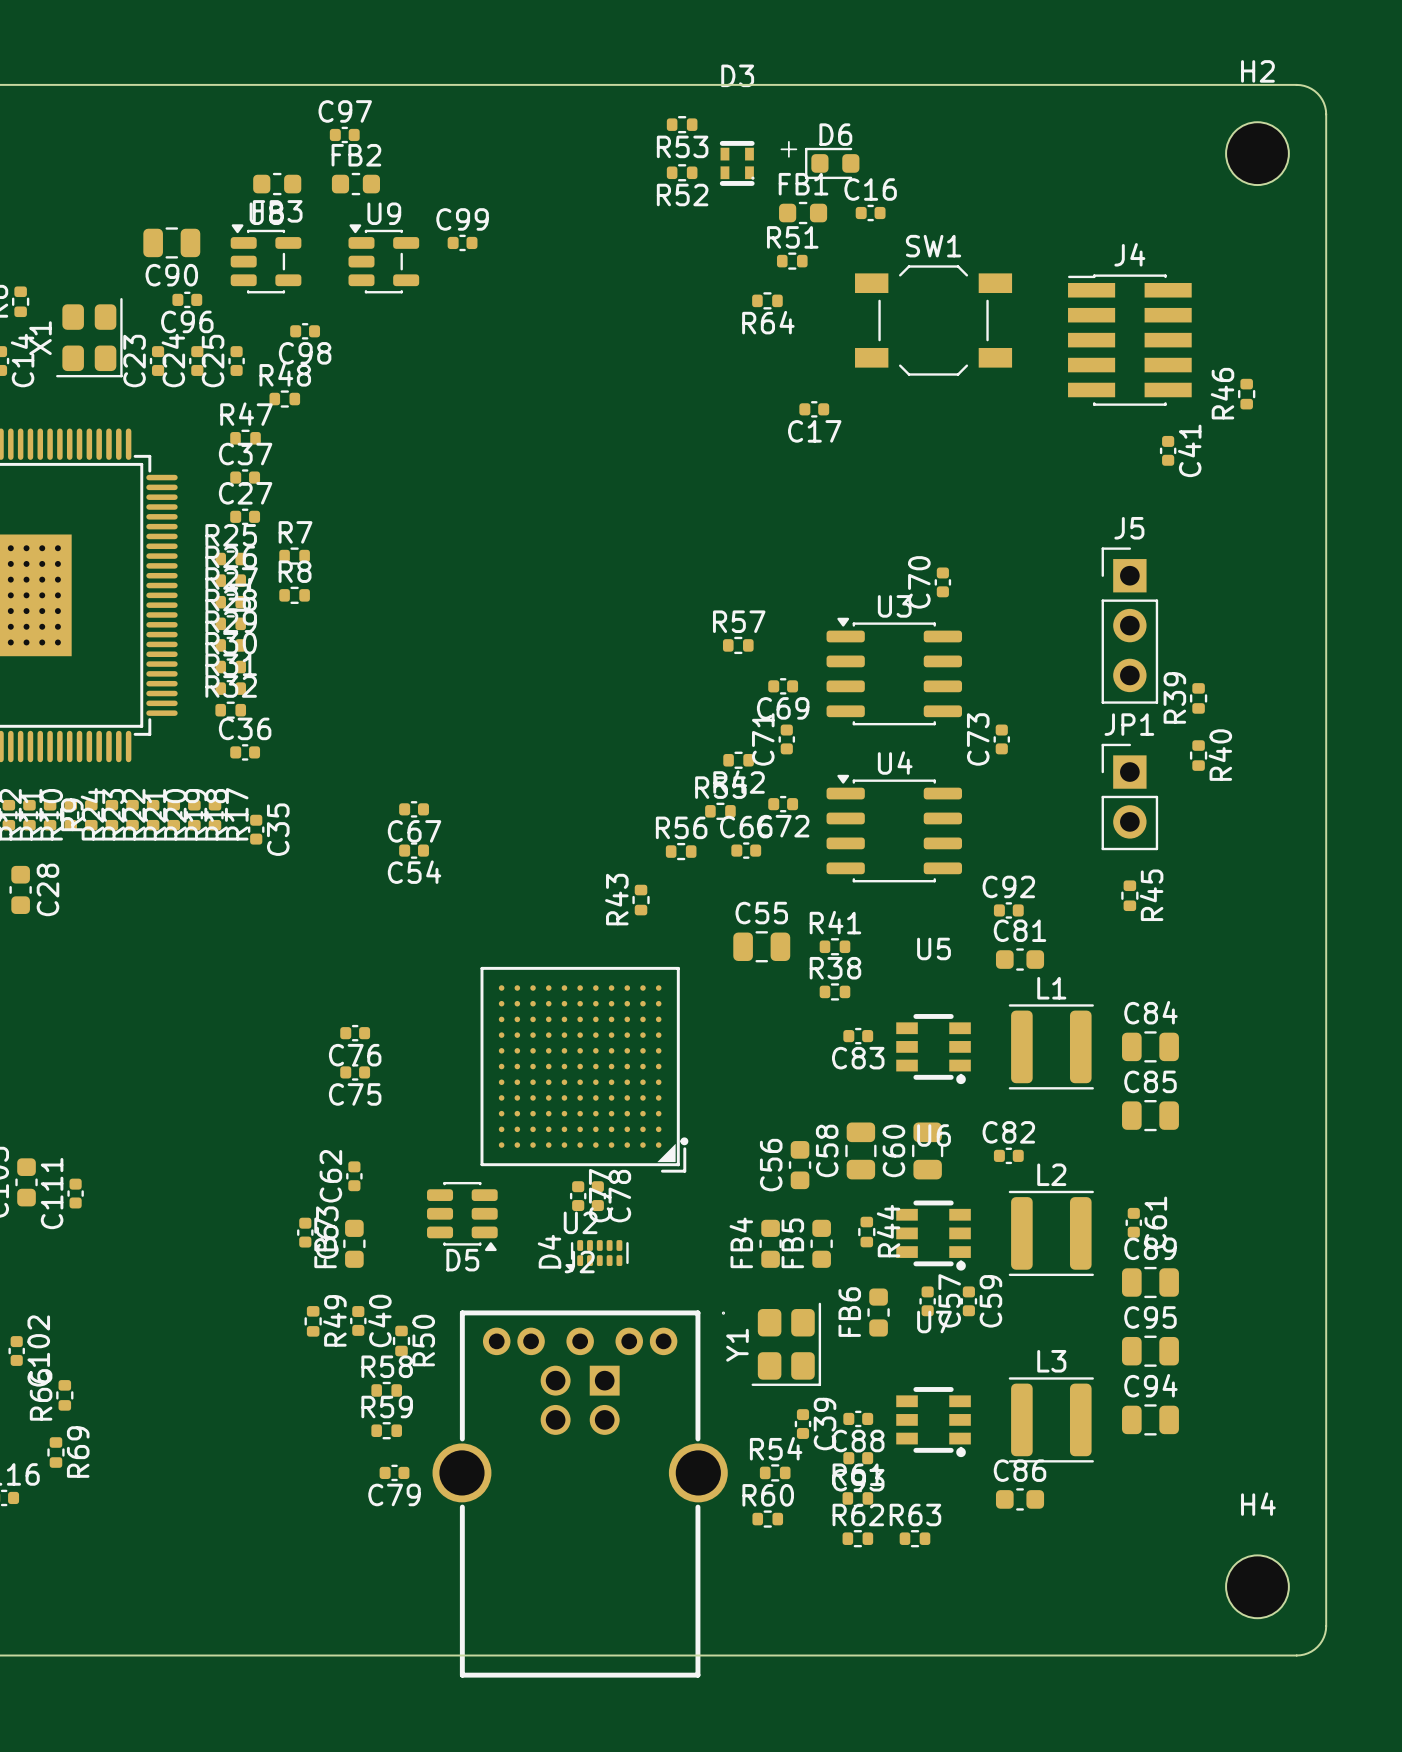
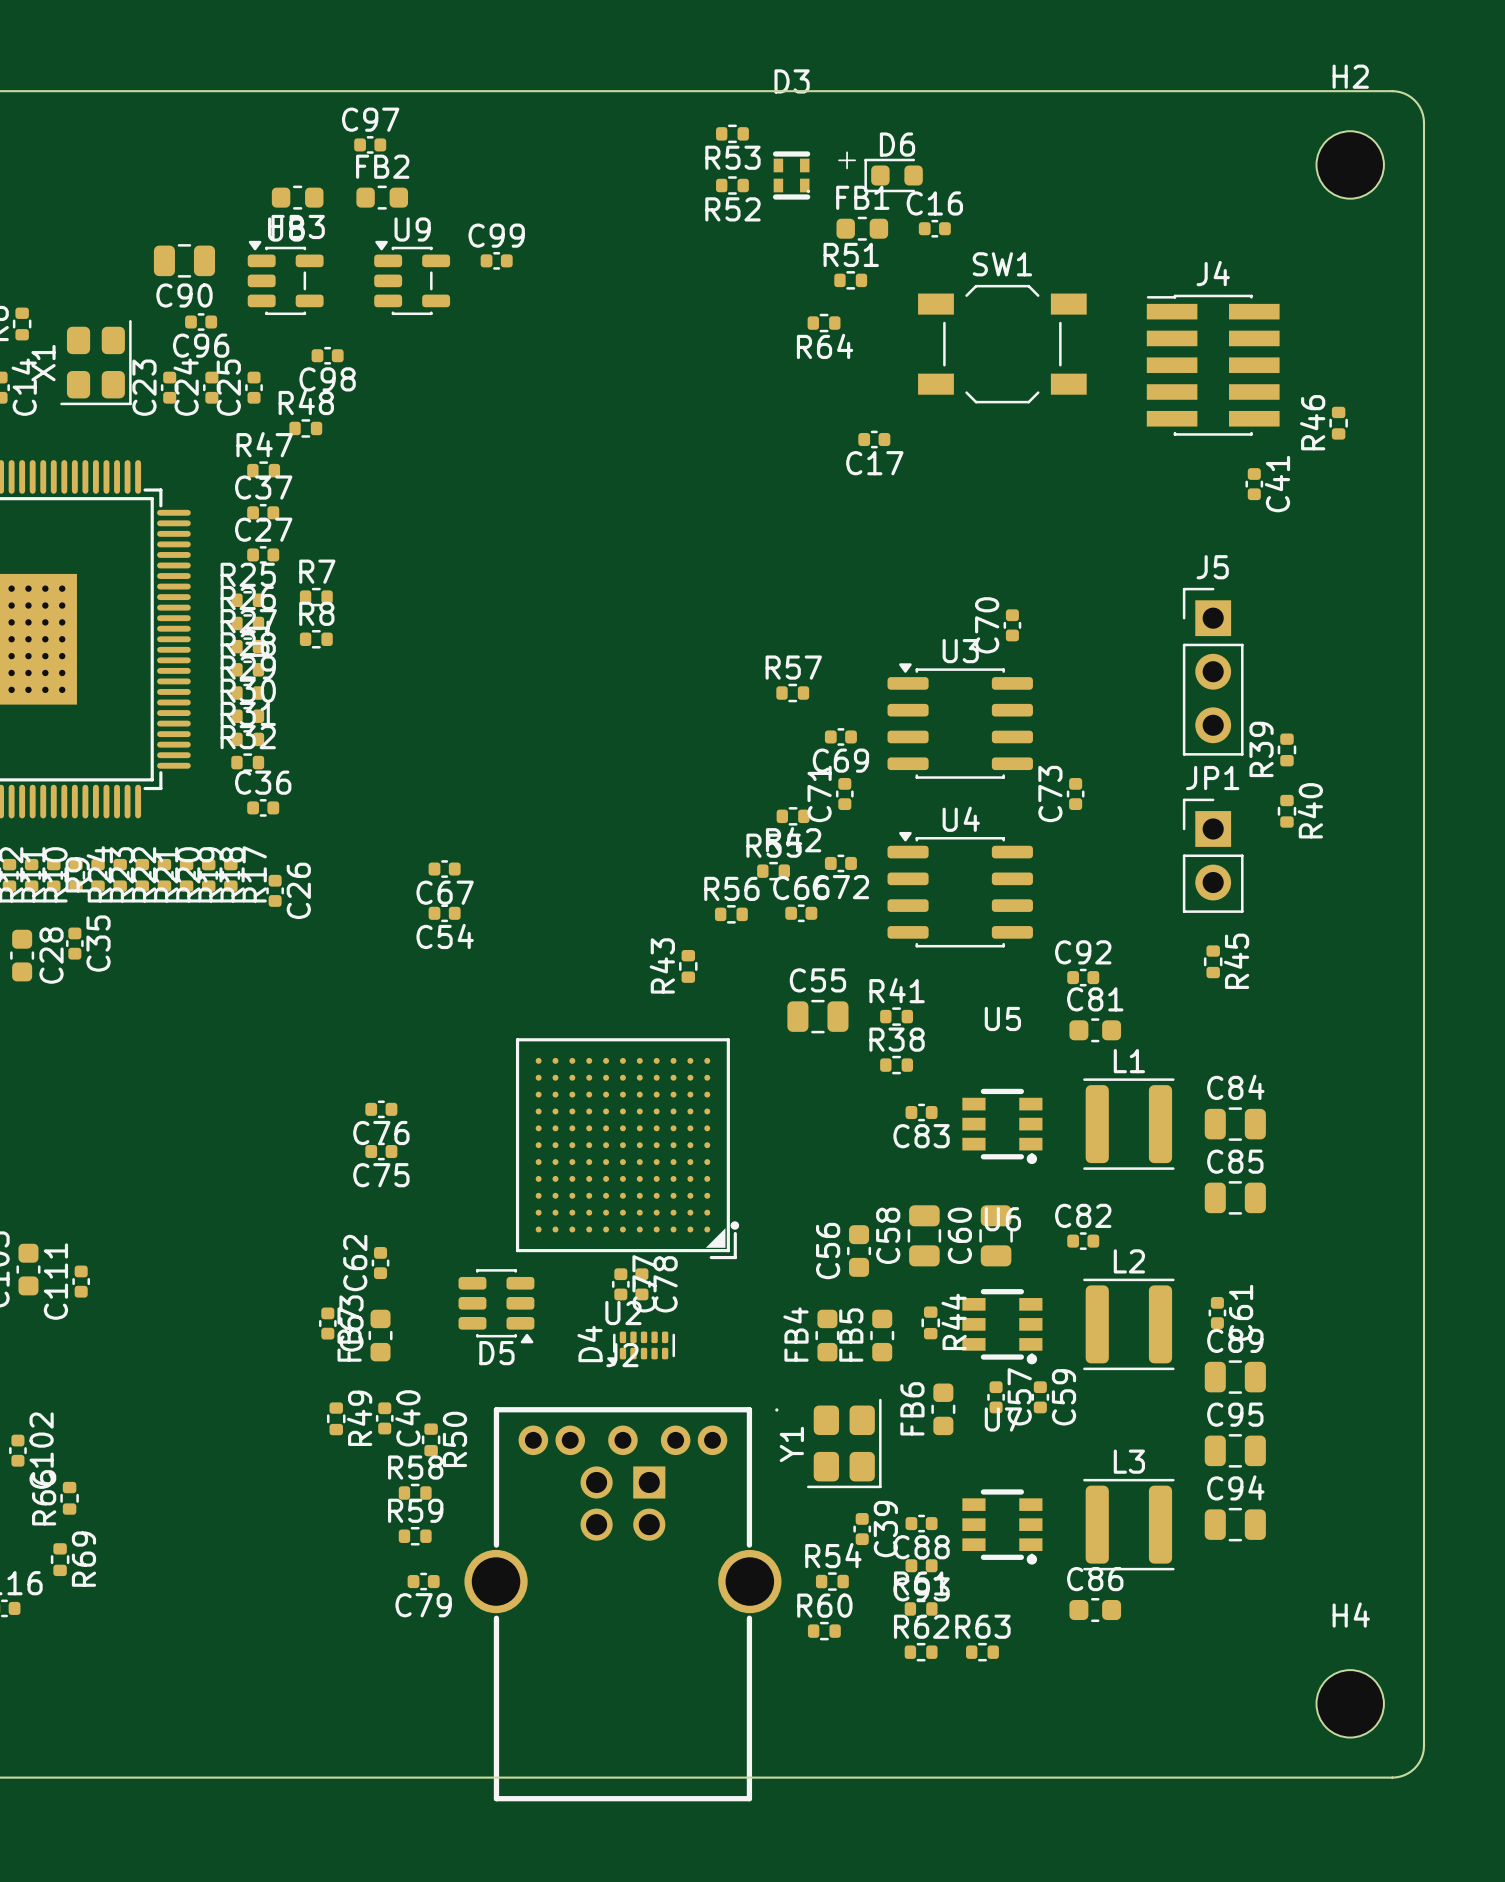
C35 name: C35 (278, 829) -> C26 (298, 890)
C35: none -> (74, 943)

